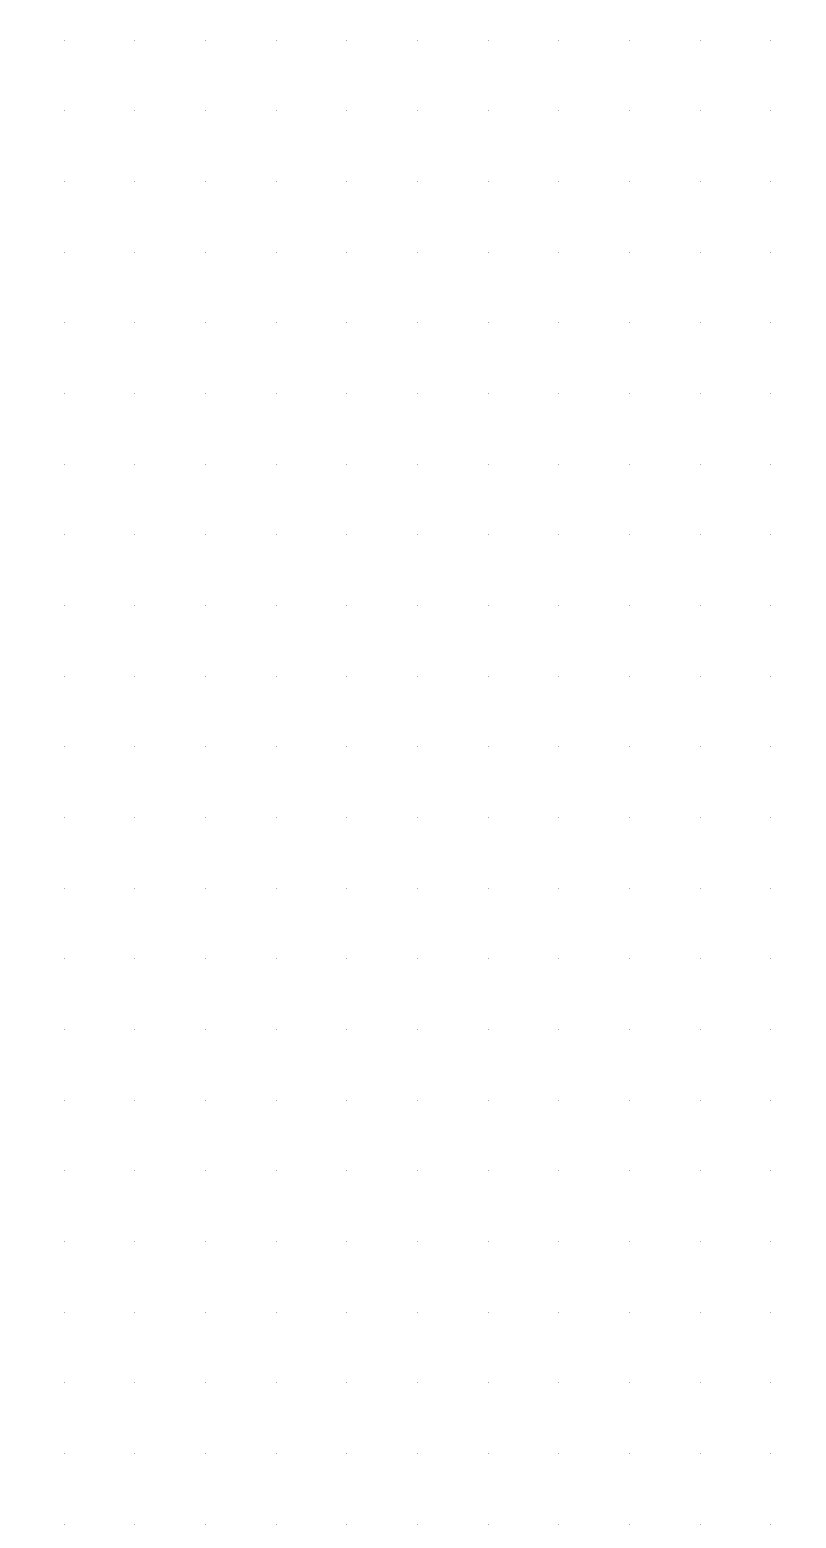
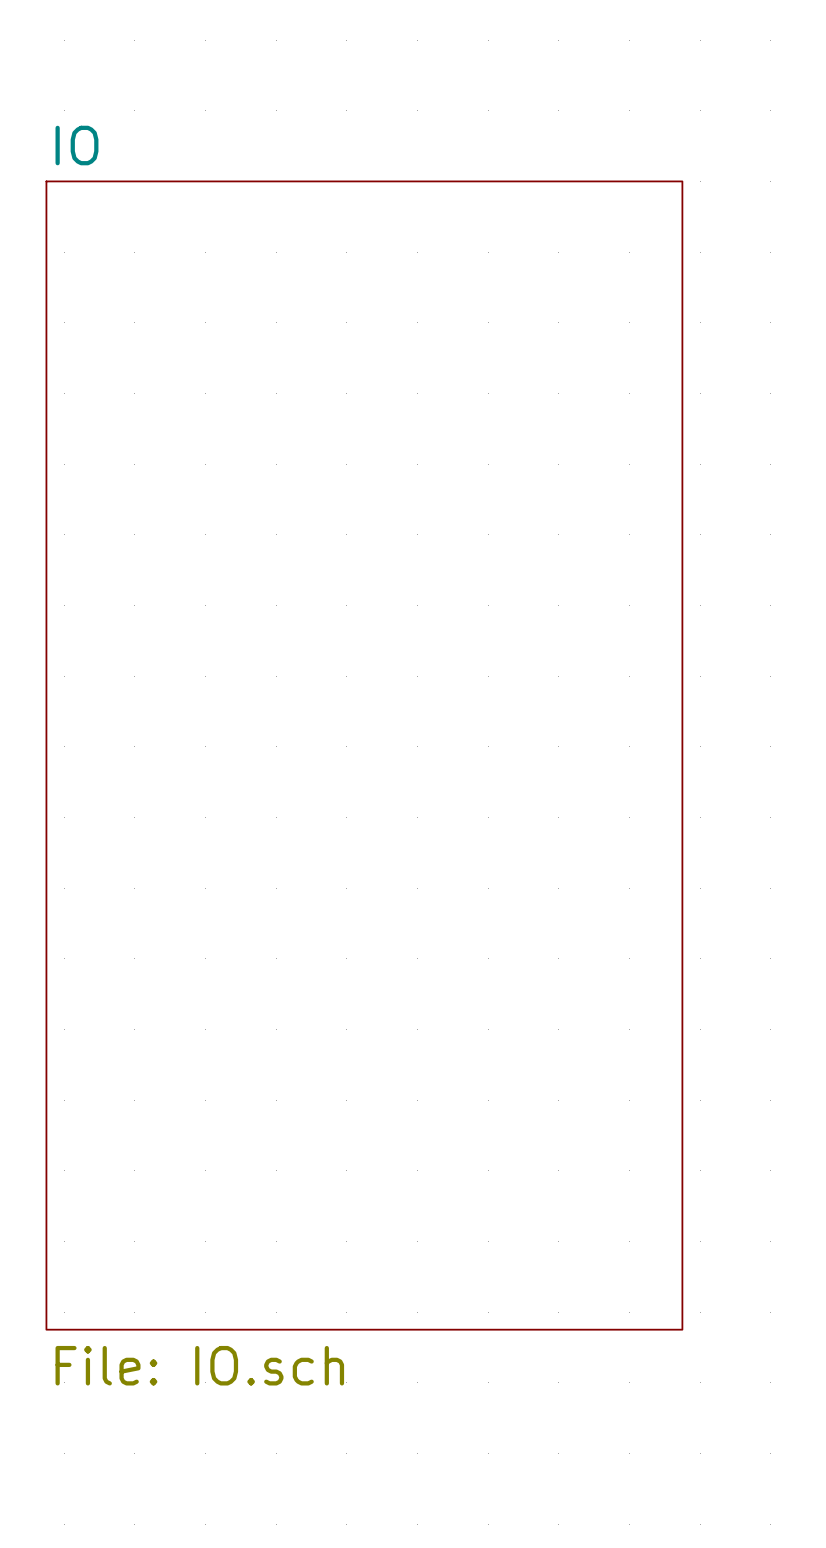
sheet IO: none -> File: IO.sch (364, 755)

